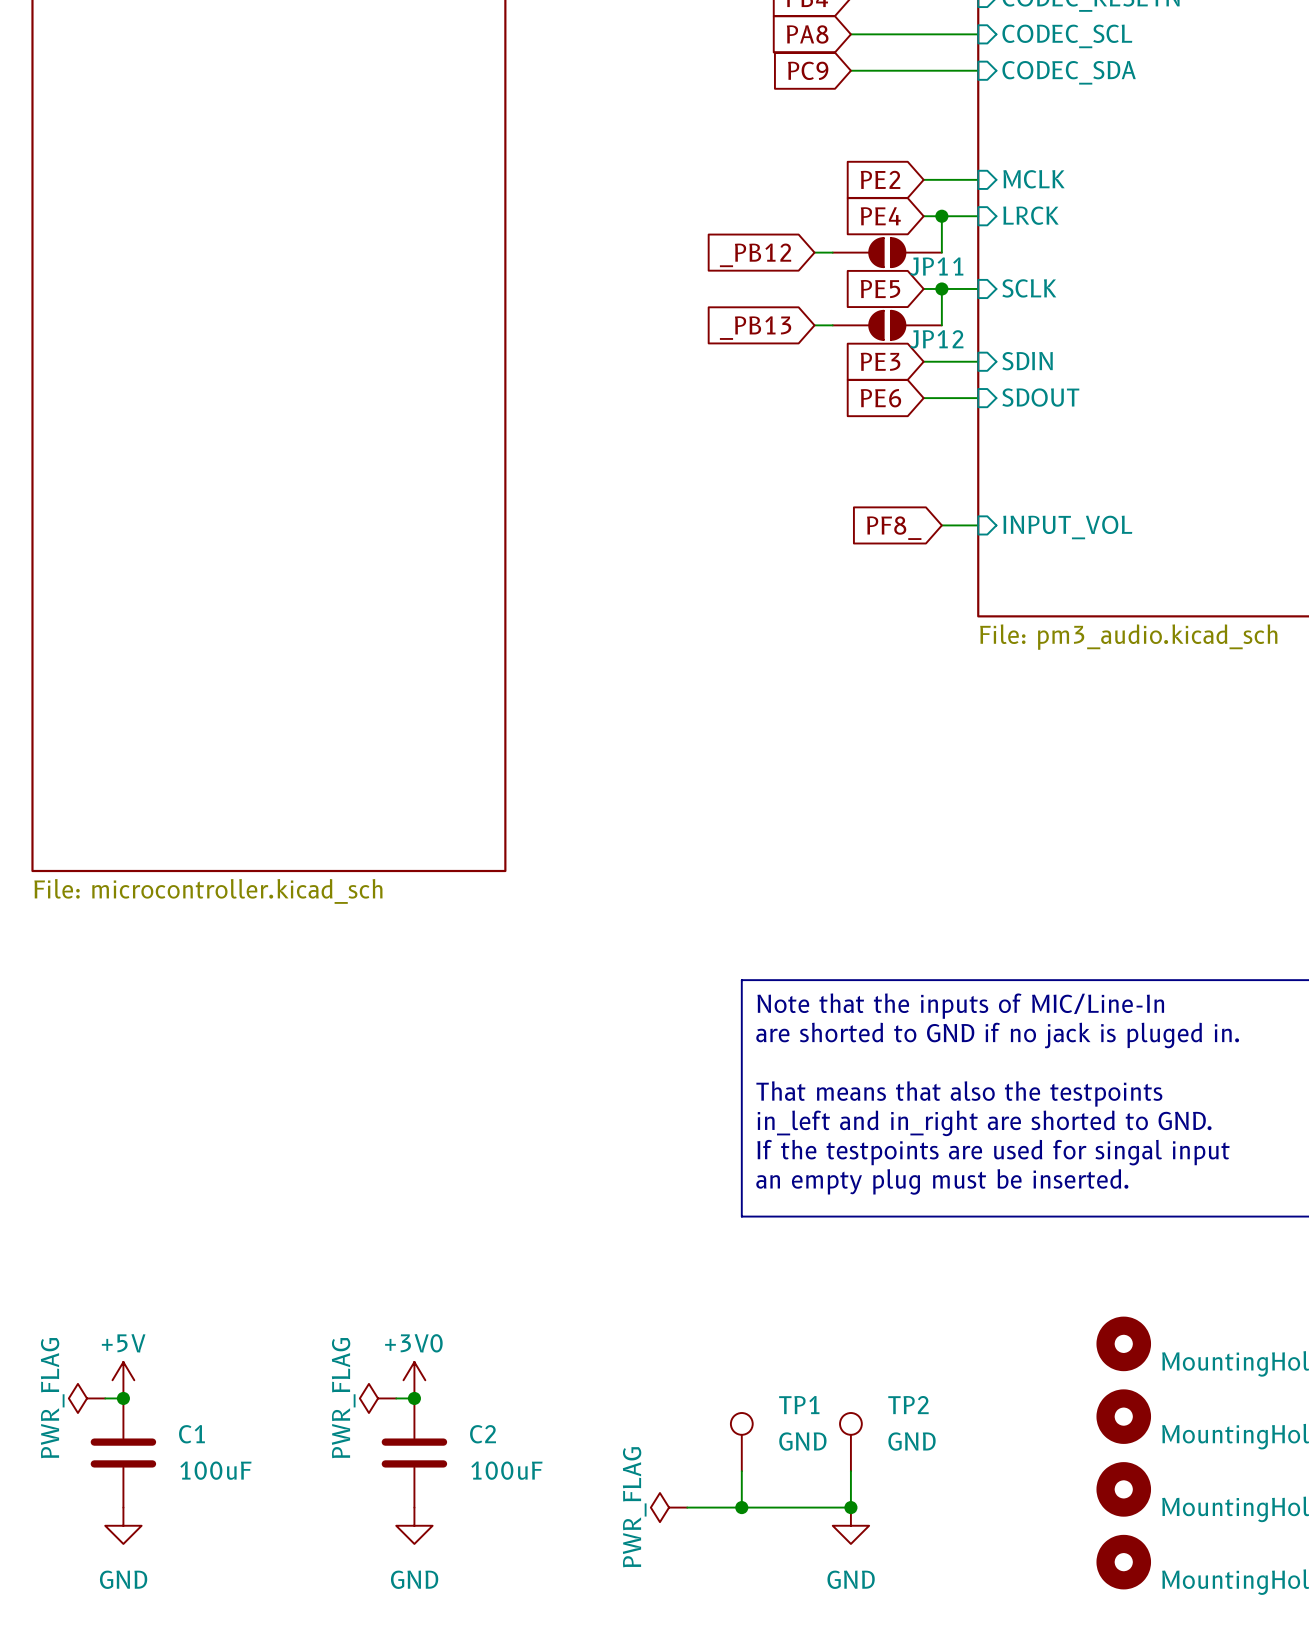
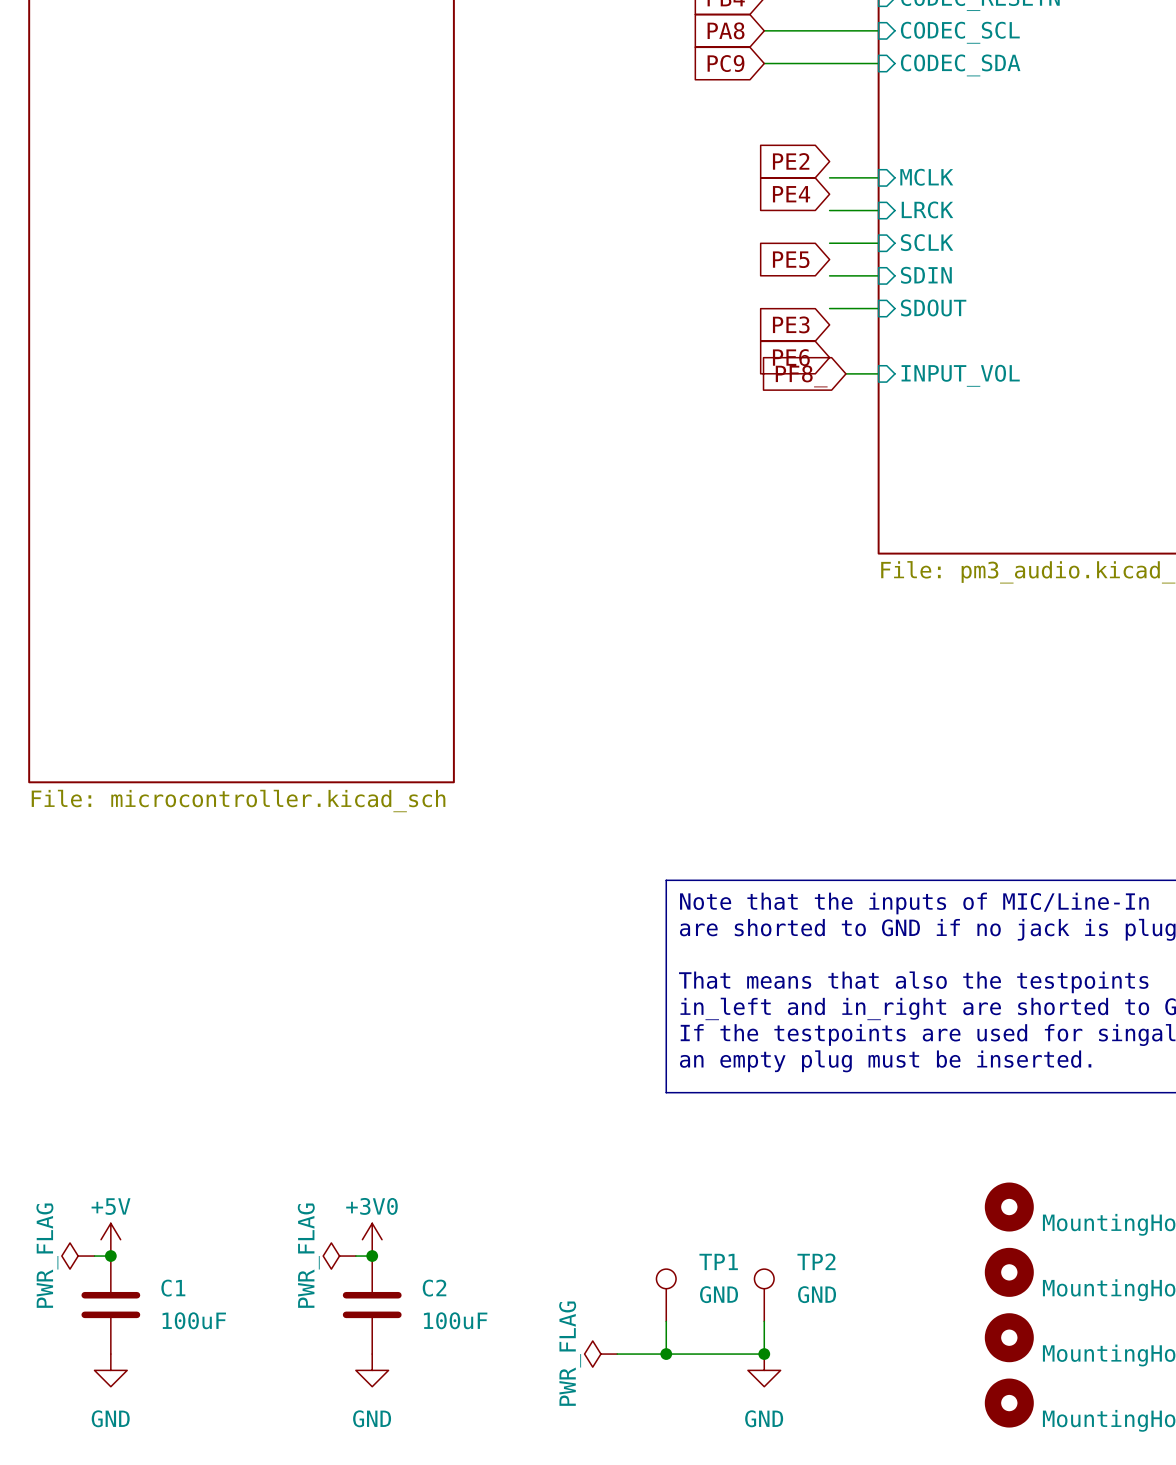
wire: (923, 179) (978, 179) -> (829, 177) (878, 177)
sheet pin position: MCLK (1034, 179) -> MCLK (926, 177)
sheet pin position: LRCK (1030, 215) -> LRCK (927, 209)
wire: (923, 216) (978, 216) -> (829, 210) (878, 210)
wire: (941, 216) (941, 252) -> none
junction: (941, 216) -> none
wire: (814, 252) (832, 252) -> none
JP11: (887, 252) -> none
global label: _PB12 (755, 255) -> none
wire: (923, 288) (978, 288) -> (829, 275) (878, 275)
wire: (941, 288) (941, 325) -> none
junction: (941, 288) -> none
sheet pin position: SCLK (1029, 288) -> SCLK (927, 242)
wire: (814, 325) (832, 325) -> none
JP12: (887, 325) -> none
global label: _PB13 (755, 328) -> none
wire: (923, 361) (978, 361) -> (829, 308) (878, 308)
sheet pin position: SDIN (1027, 361) -> SDIN (926, 275)
sheet pin position: SDOUT (1040, 397) -> SDOUT (933, 307)
wire: (923, 398) (978, 398) -> (829, 243) (878, 243)
wire: (941, 525) (978, 525) -> (845, 373) (878, 373)
sheet pin position: INPUT_VOL (1067, 527) -> INPUT_VOL (960, 375)
global label position: PF8_ (894, 528) -> PF8_ (801, 376)

